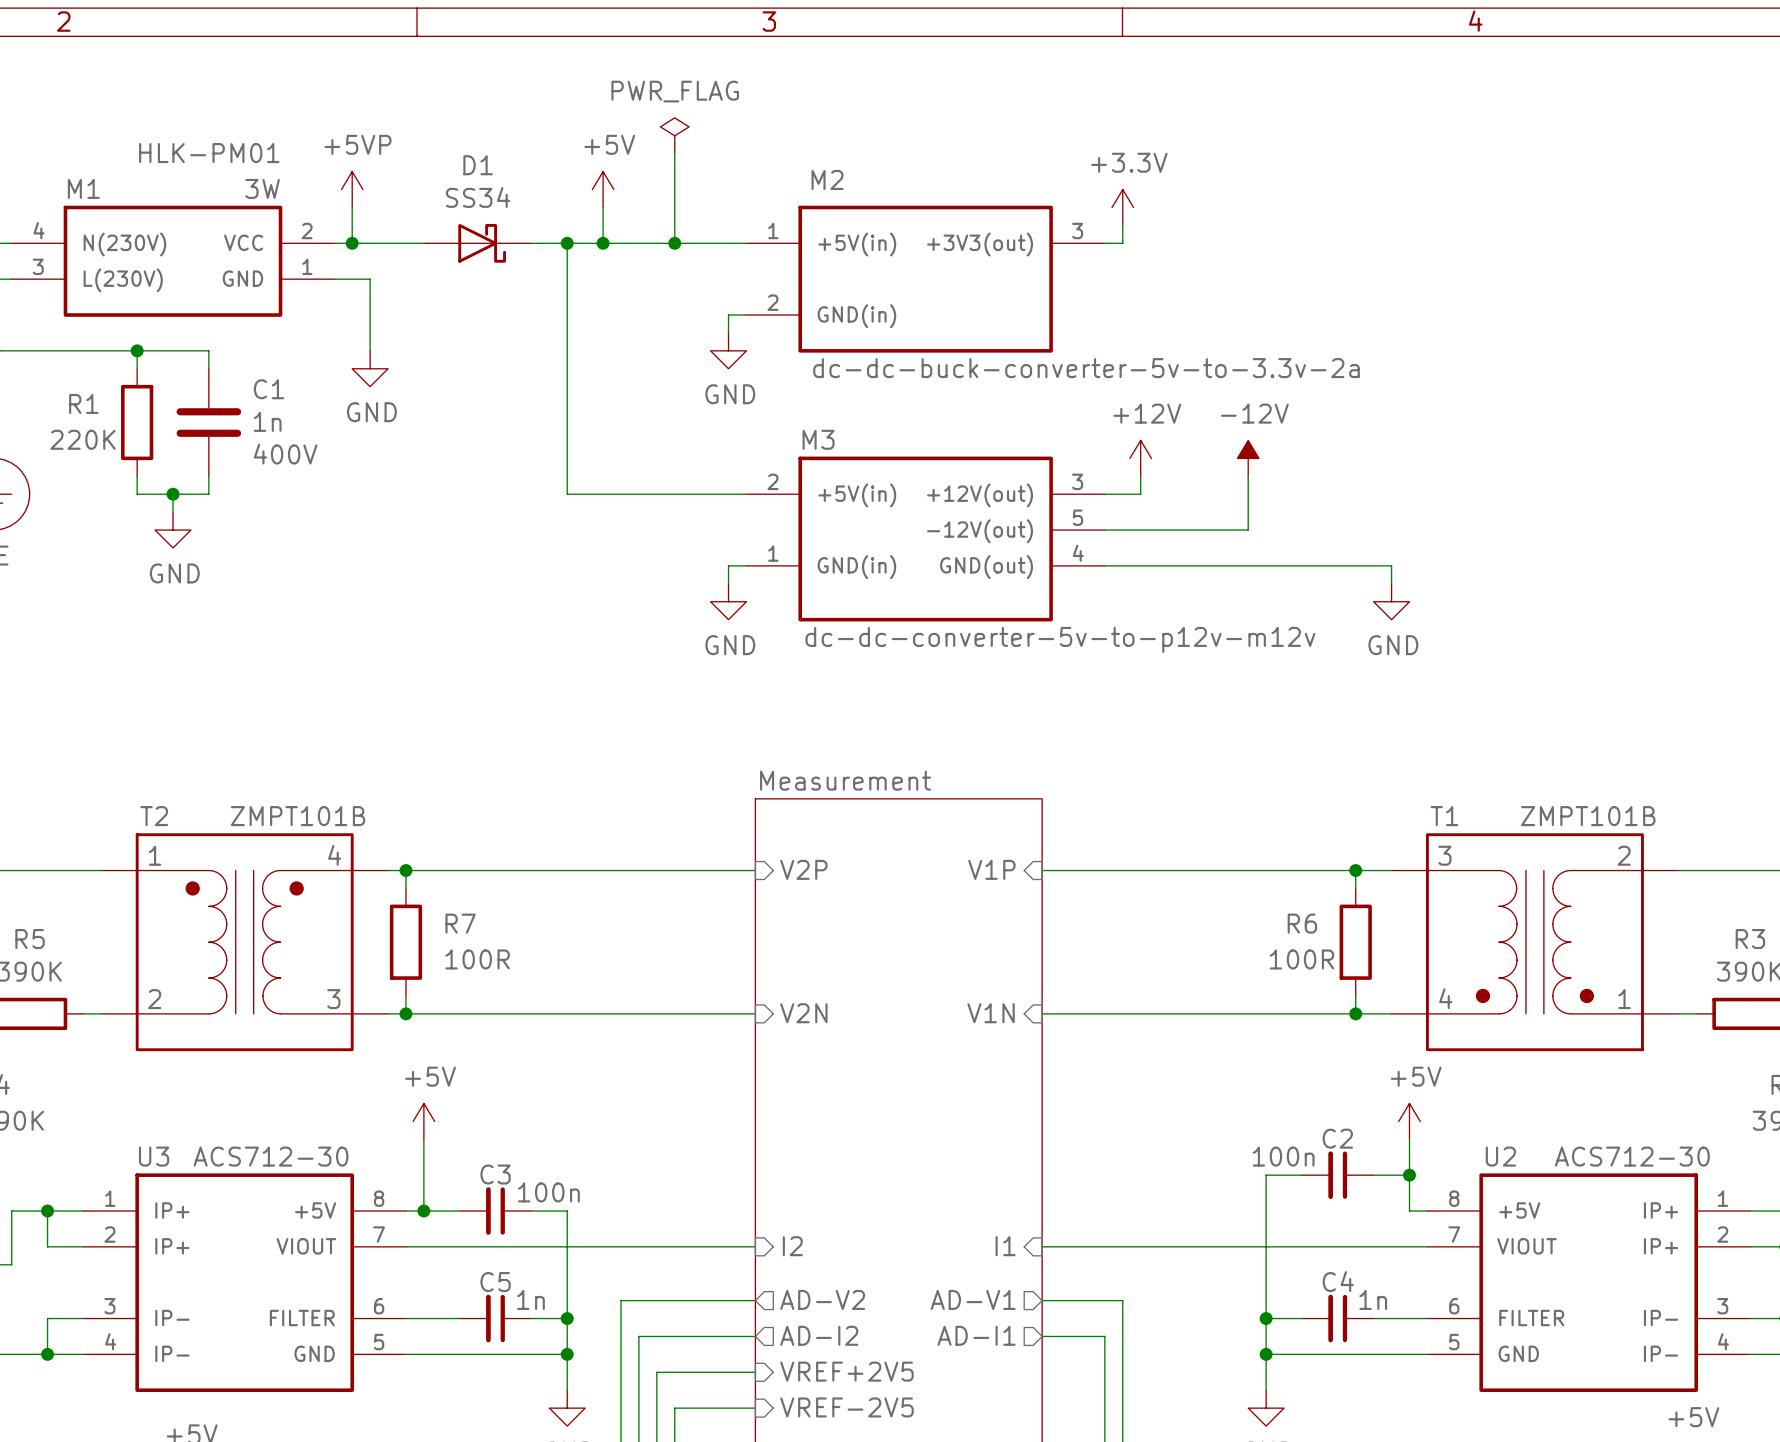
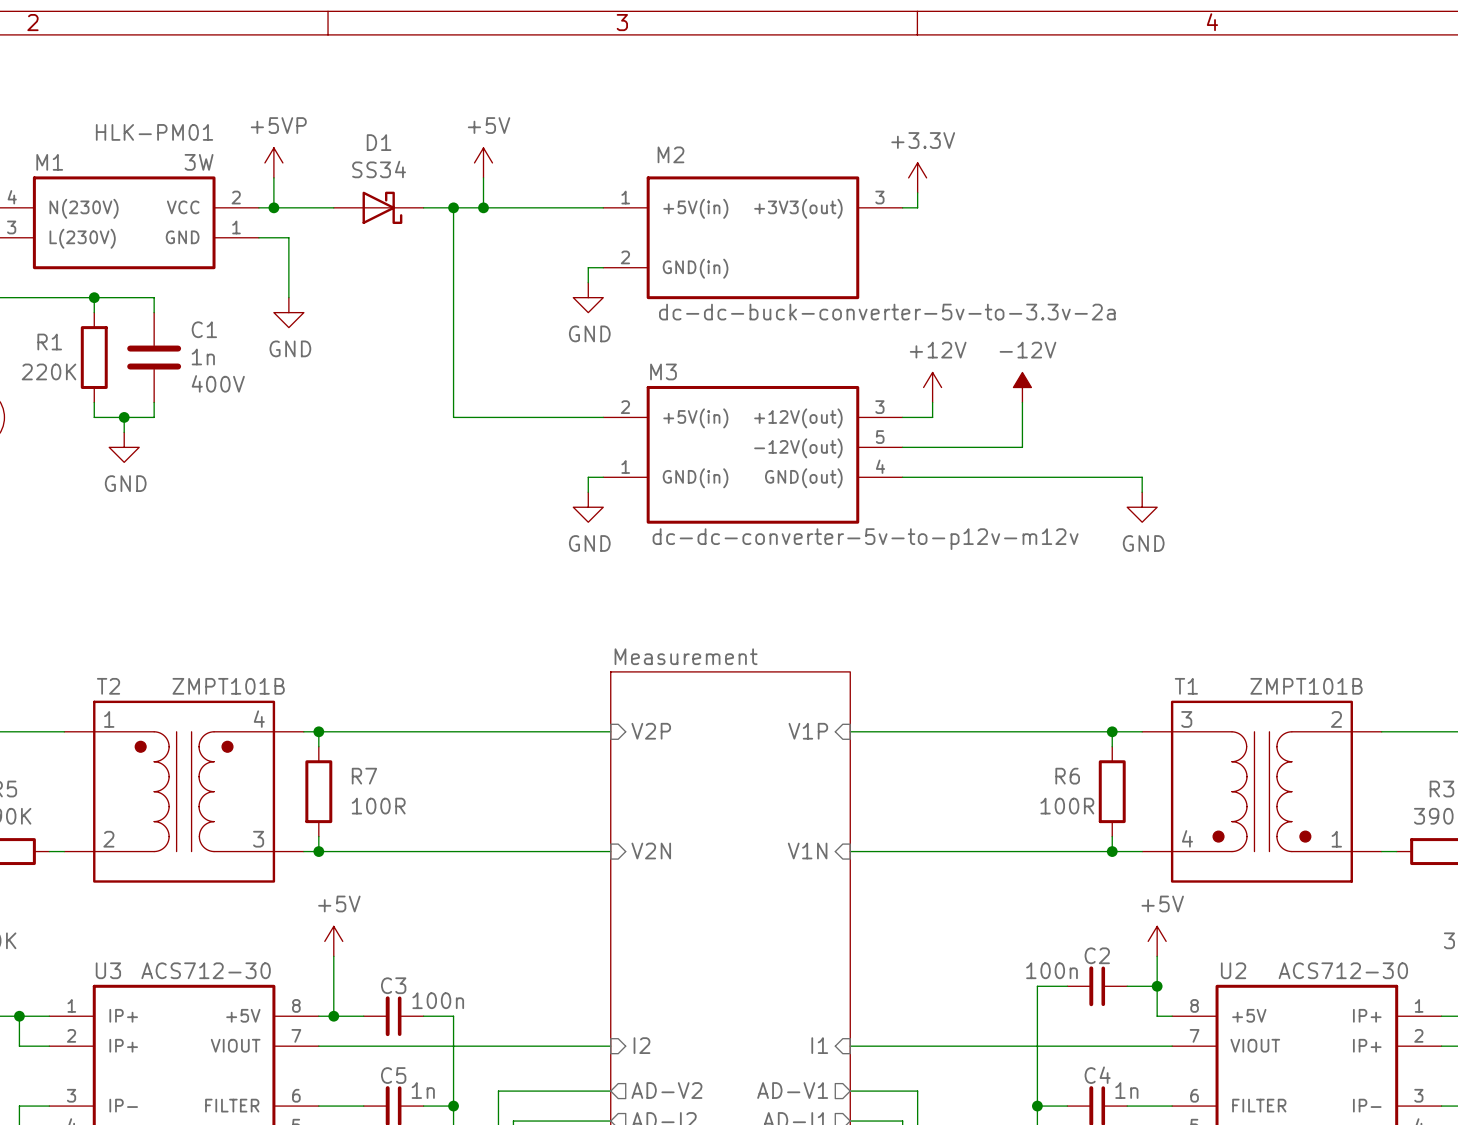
power symbol: PWR_FLAG (674, 135) -> none
wire: (674, 153) (674, 243) -> none
junction: (674, 243) -> none

